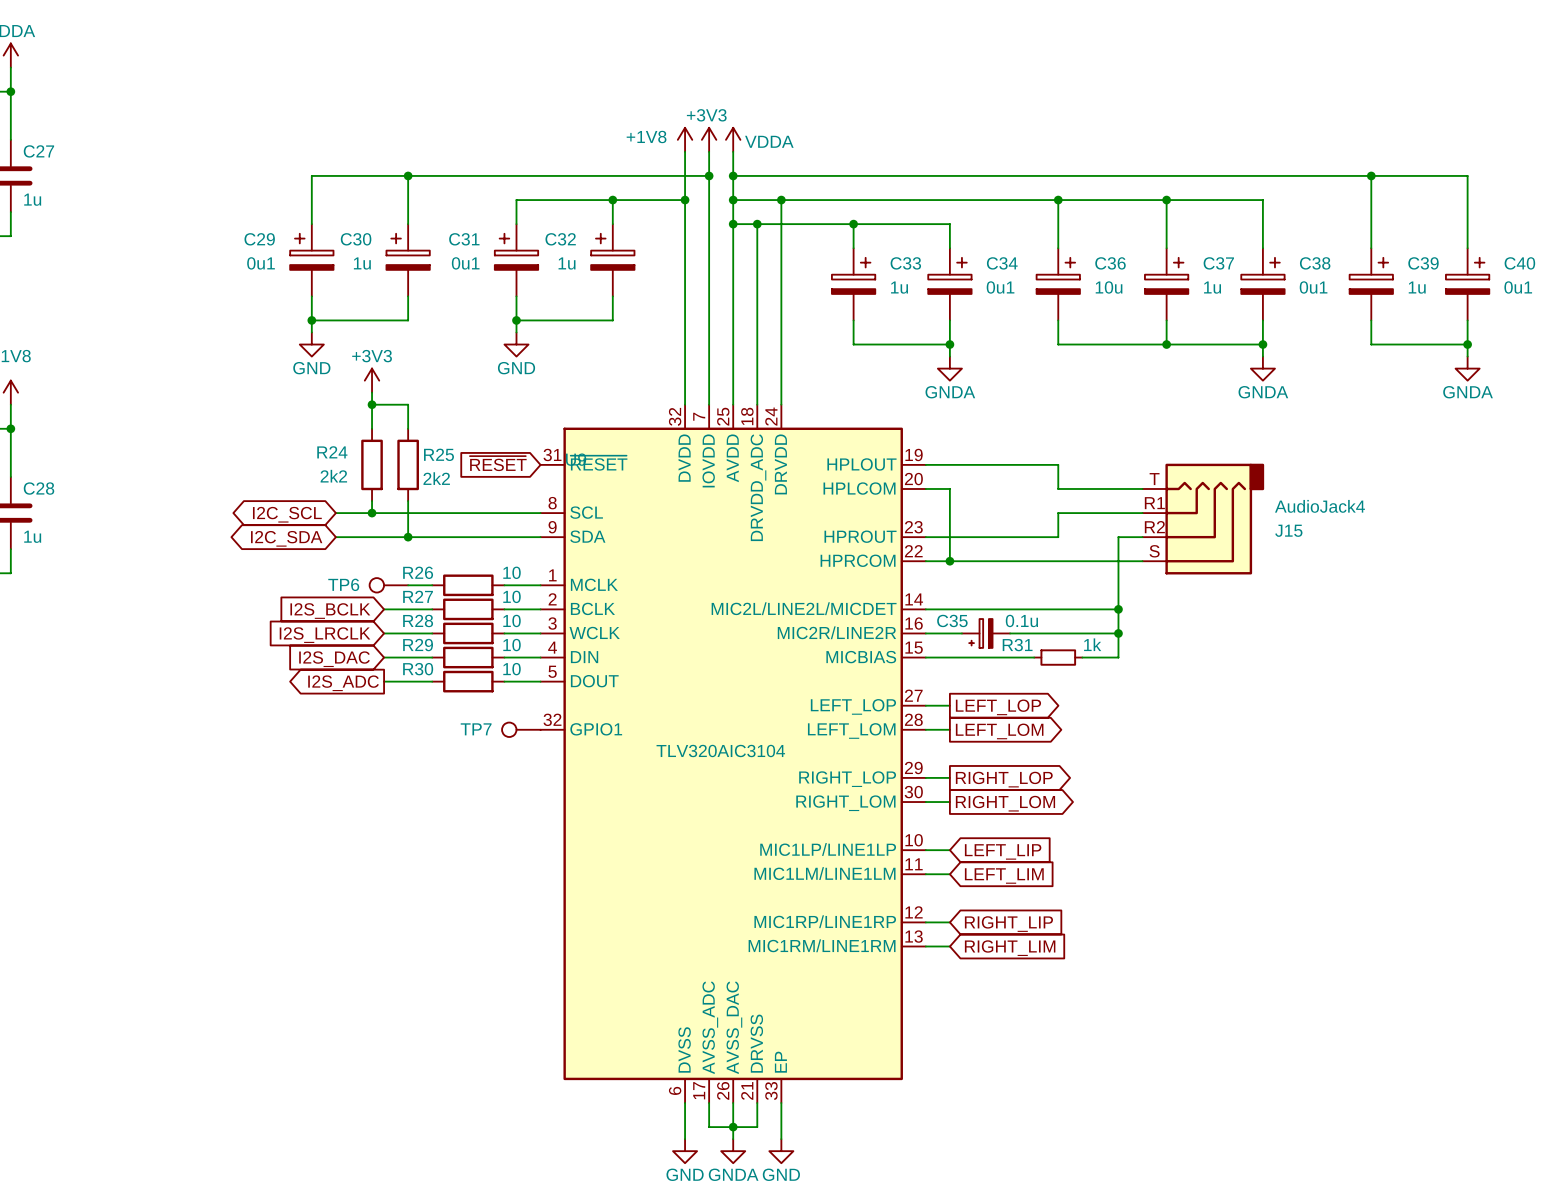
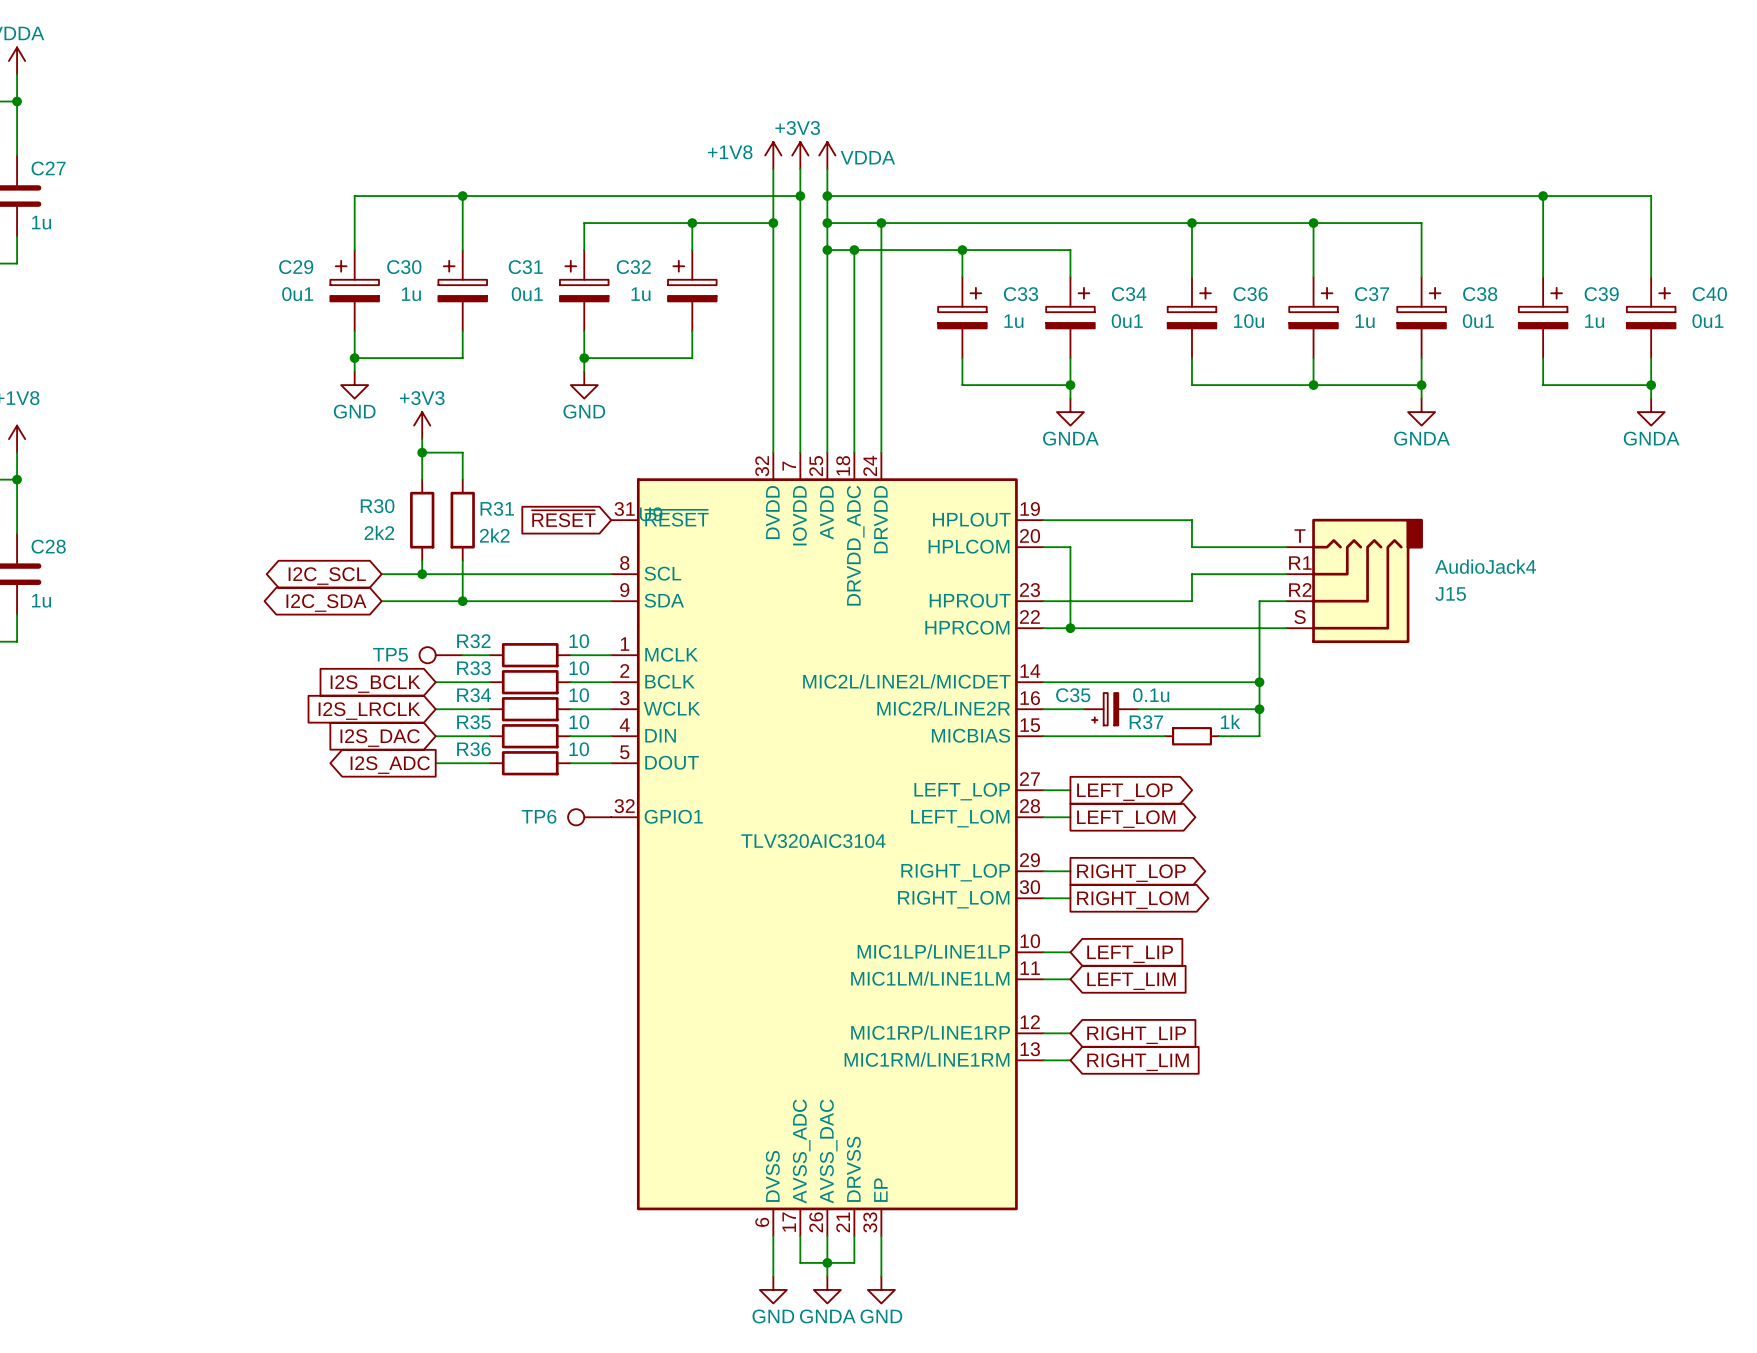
R24 name: R24 (332, 452) -> R30 (377, 506)
R25 name: R25 (438, 454) -> R31 (497, 508)
R26 name: R26 (418, 572) -> R32 (473, 641)
TP6 name: TP6 (343, 584) -> TP5 (390, 654)
R27 name: R27 (418, 596) -> R33 (473, 668)
R28 name: R28 (418, 620) -> R34 (474, 695)
R29 name: R29 (418, 645) -> R35 (473, 722)
R31 name: R31 (1017, 645) -> R37 (1146, 722)
R30 name: R30 (418, 669) -> R36 (473, 749)
TP7 name: TP7 (476, 729) -> TP6 (539, 816)

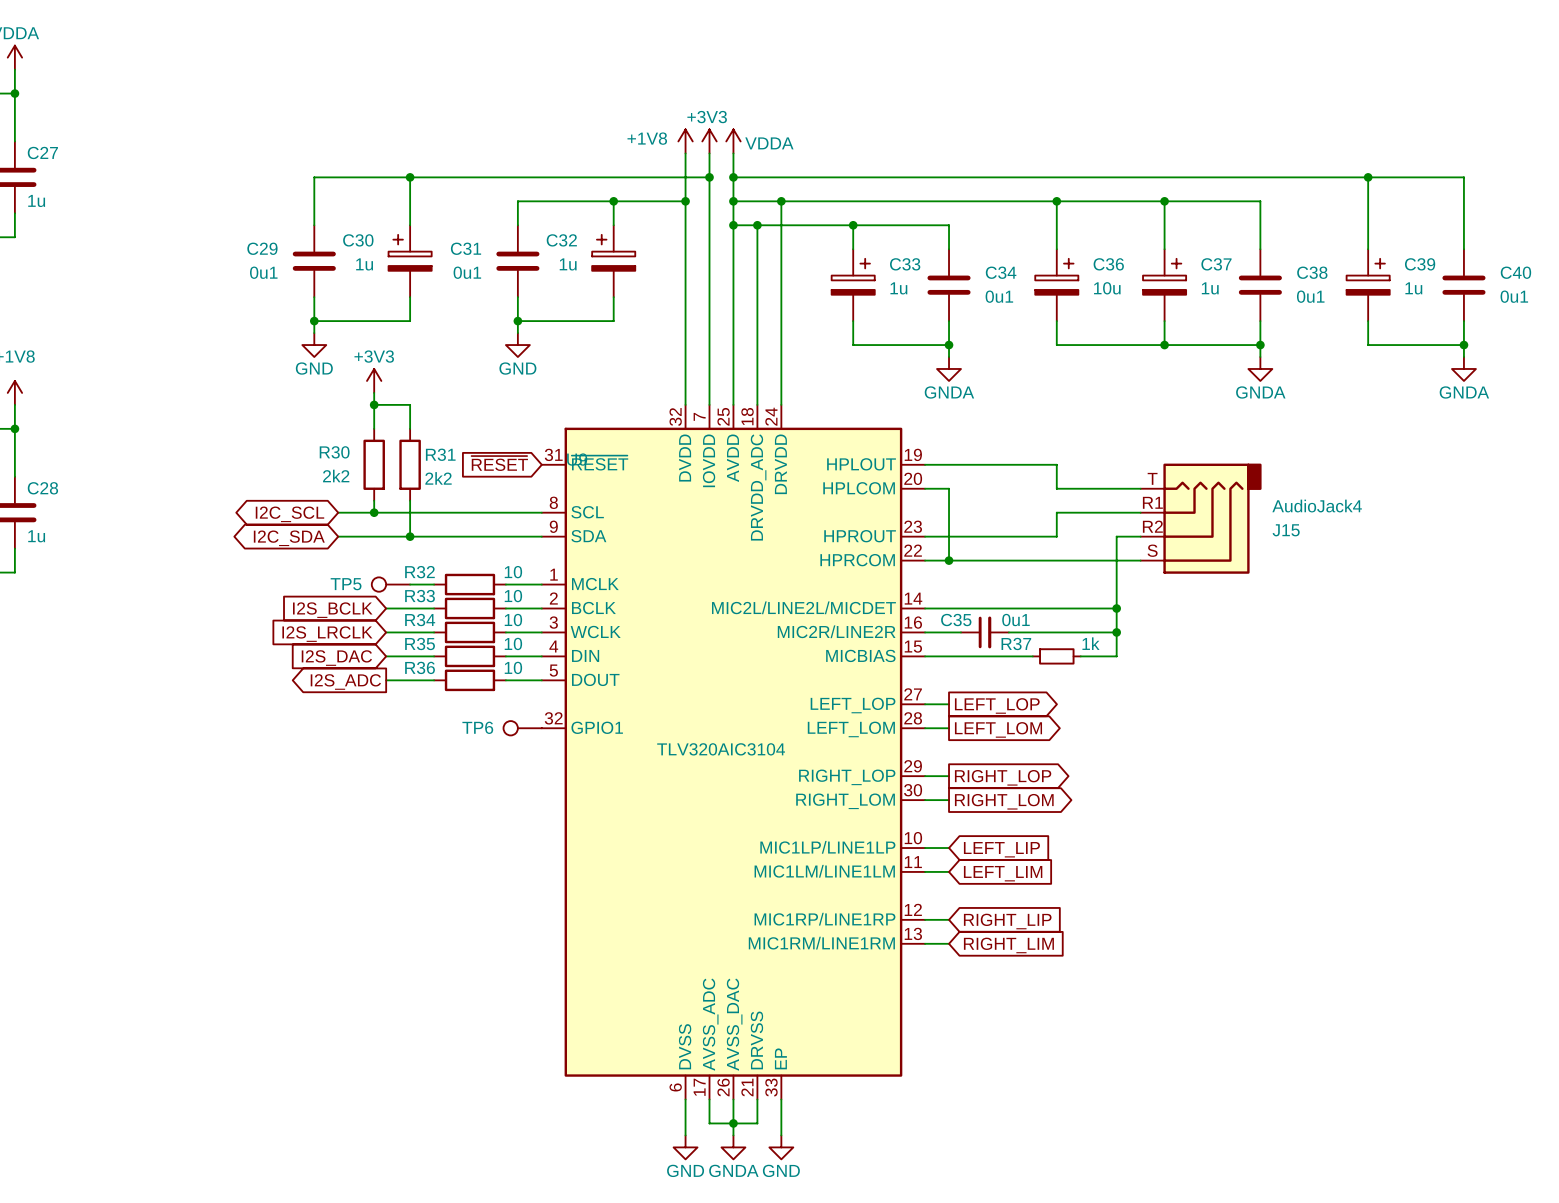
C29 symbol: [330, 250, 379, 332] -> [292, 225, 336, 298]
C31 symbol: [559, 250, 609, 332] -> [496, 225, 540, 298]
C34 symbol: [1046, 277, 1095, 359] -> [927, 249, 971, 322]
C38 symbol: [1397, 277, 1446, 359] -> [1238, 249, 1282, 322]
C40 symbol: [1626, 277, 1676, 359] -> [1442, 249, 1486, 322]
C35 symbol: [1083, 693, 1138, 726] -> [960, 616, 1009, 649]
C35 value: 0.1u (1151, 695) -> 0u1 (1015, 620)

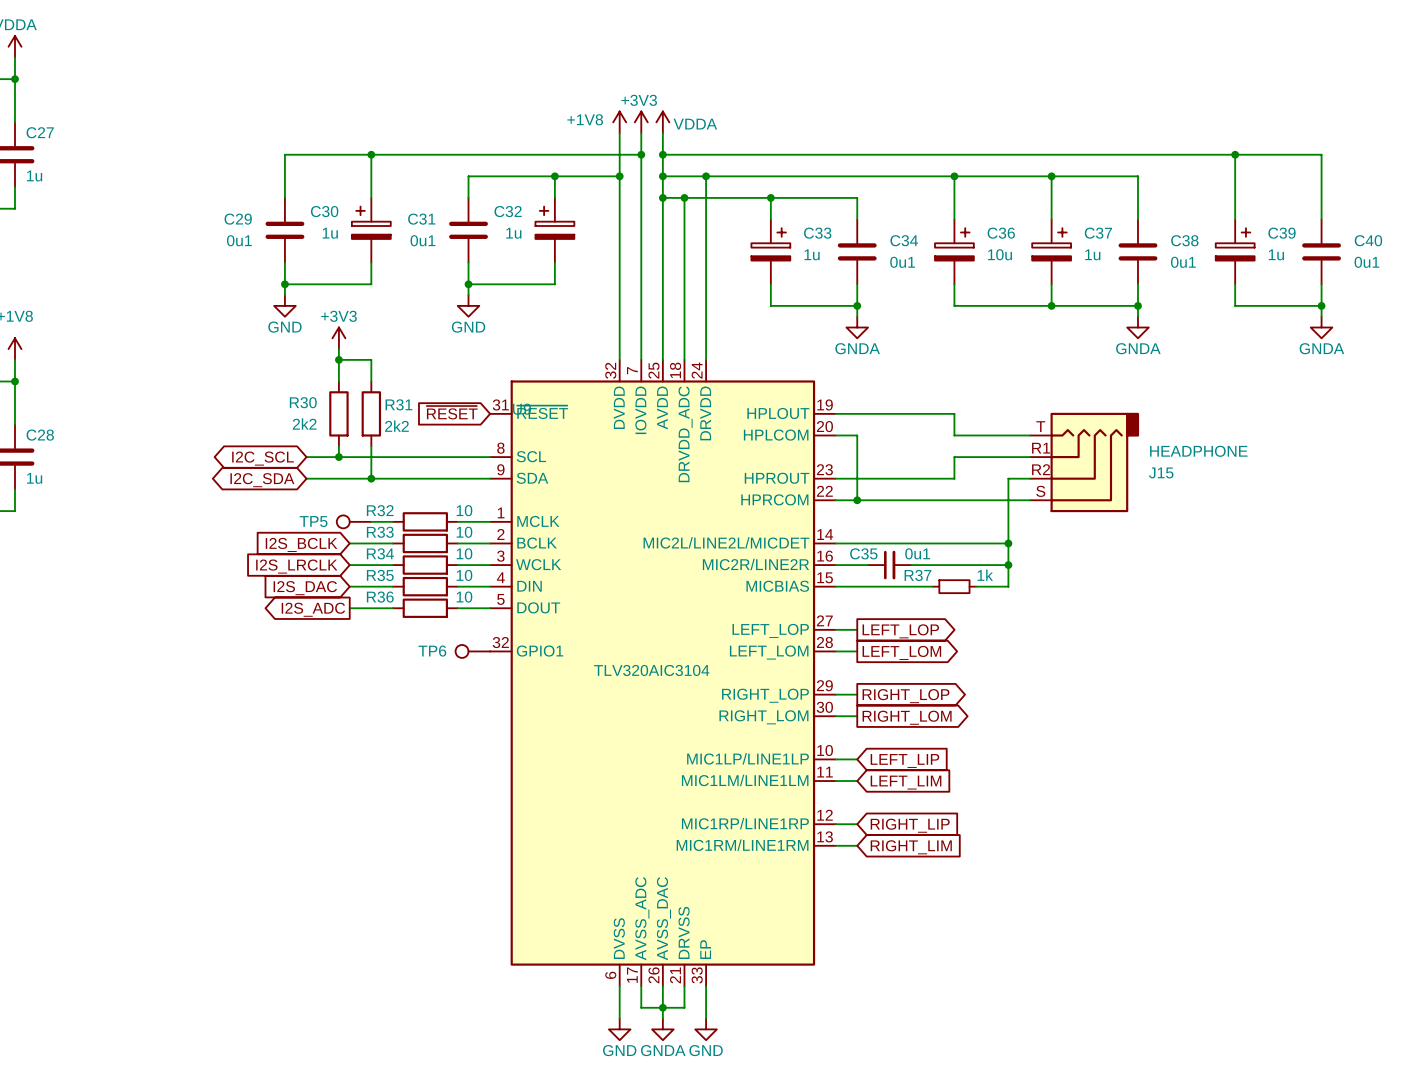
J15 value: AudioJack4 (1317, 506) -> HEADPHONE (1198, 451)

